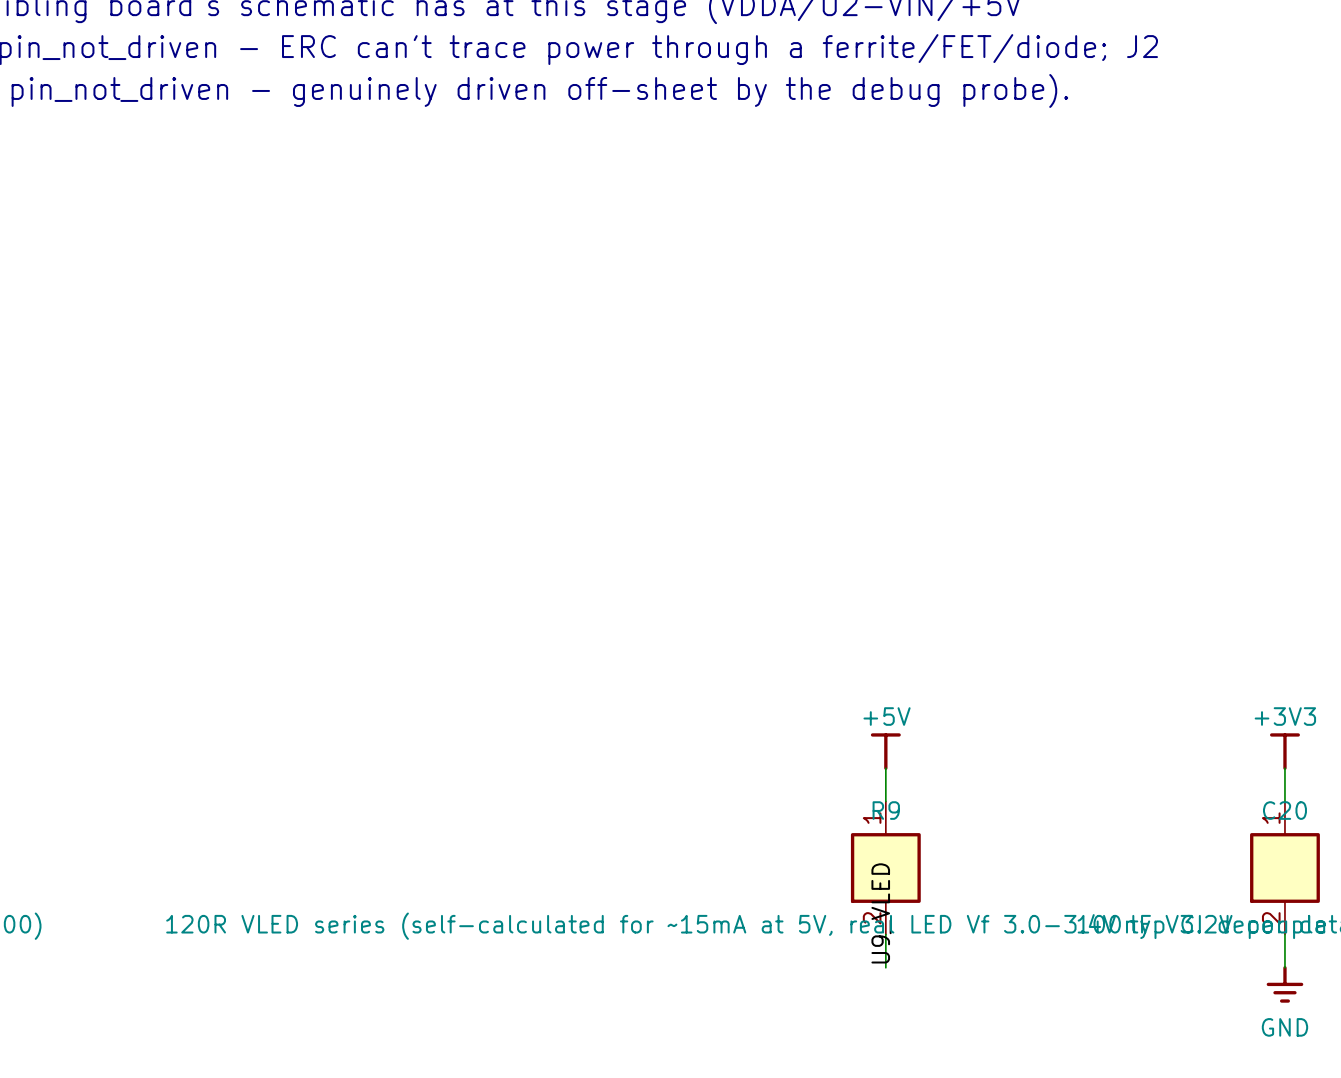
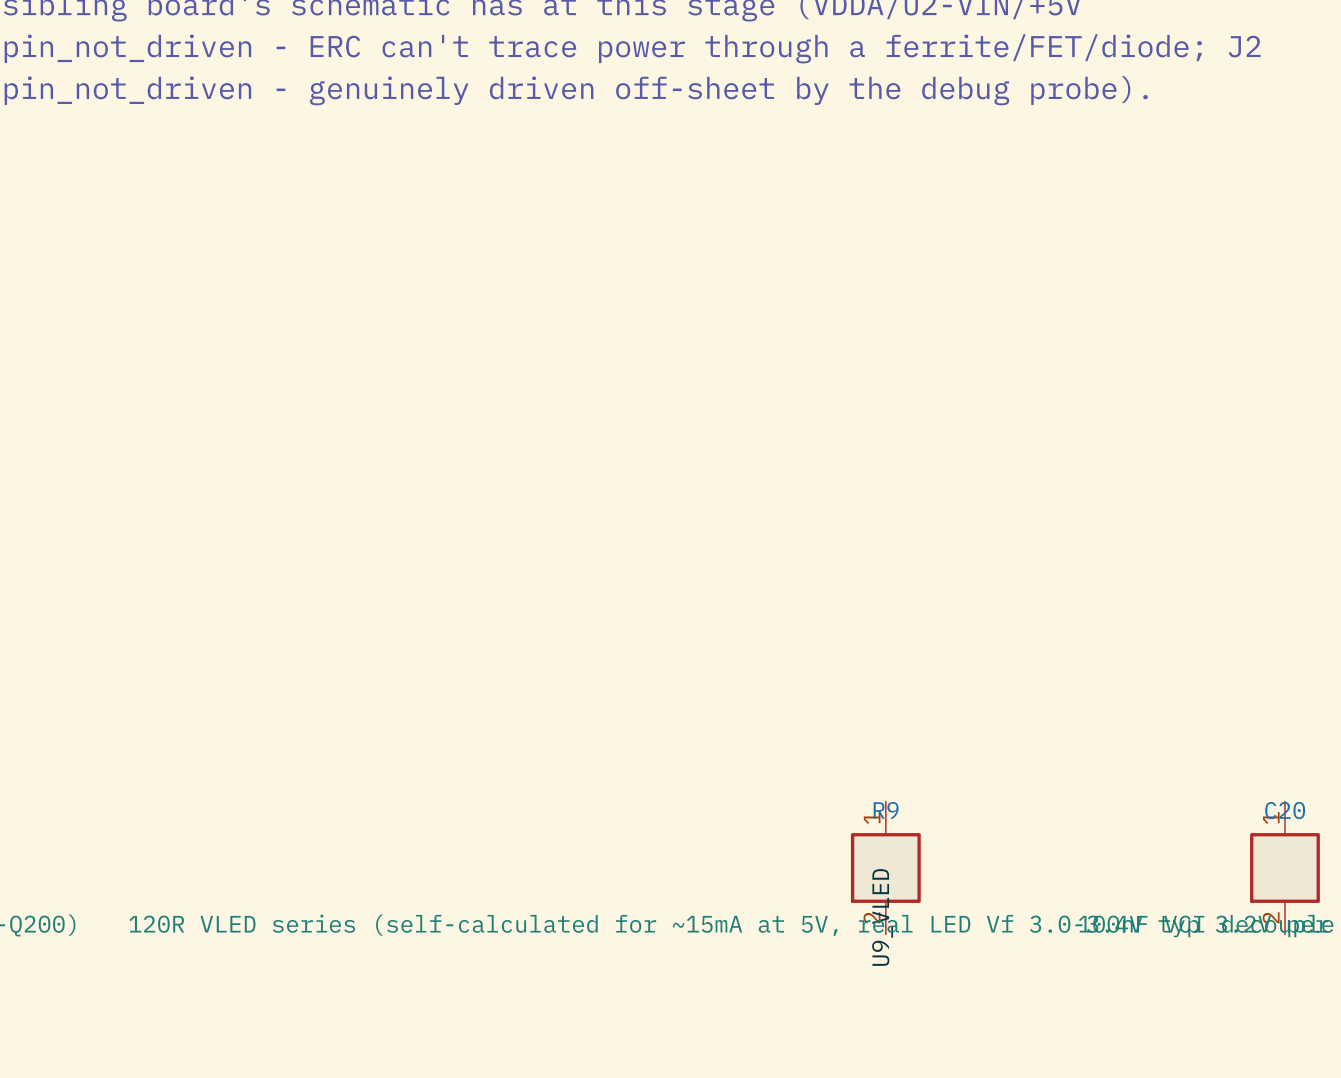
power symbol: +5V (885, 751) -> none
power symbol: +3V3 (1284, 751) -> none
wire: (885, 768) (885, 801) -> none
wire: (1284, 768) (1284, 801) -> none
wire: (885, 934) (885, 967) -> none
wire: (1284, 934) (1284, 967) -> none
power symbol: GND (1284, 984) -> none

